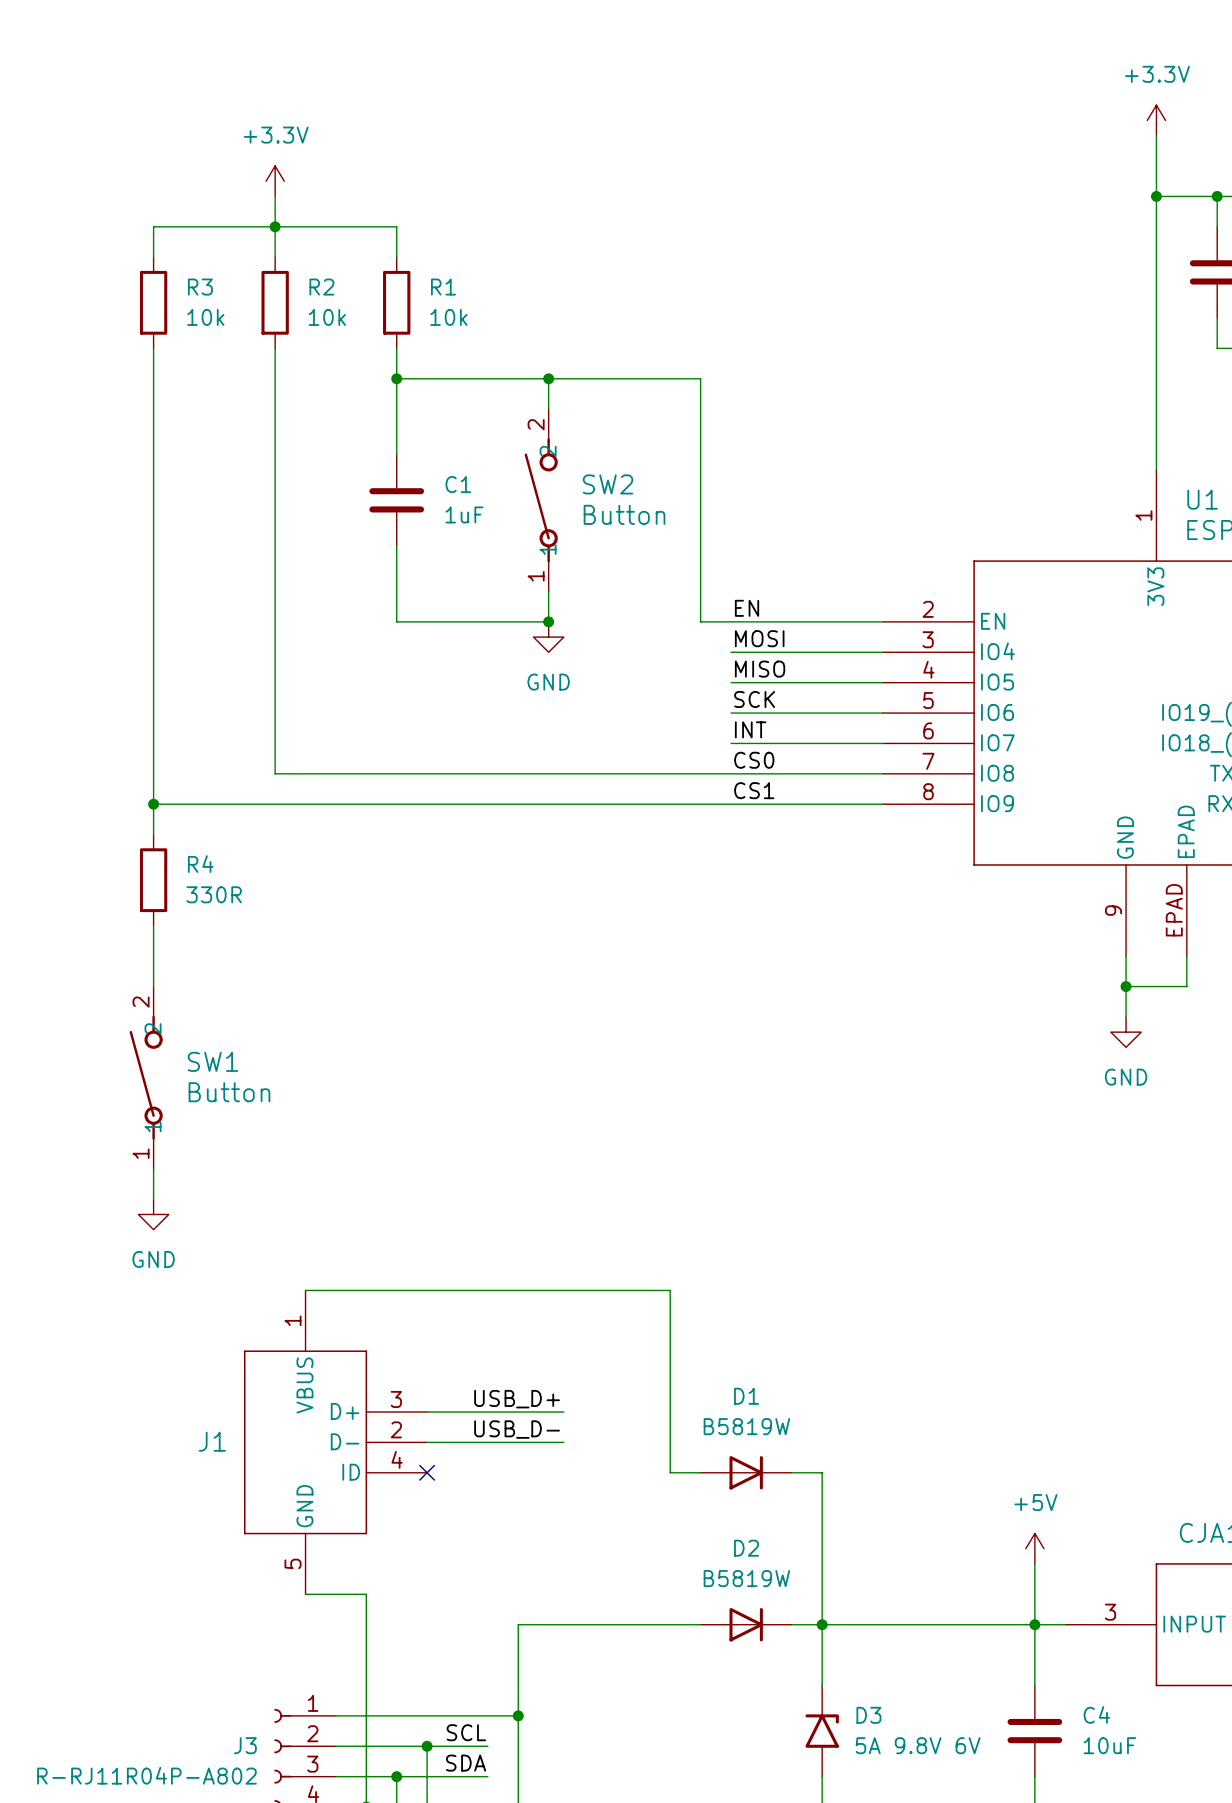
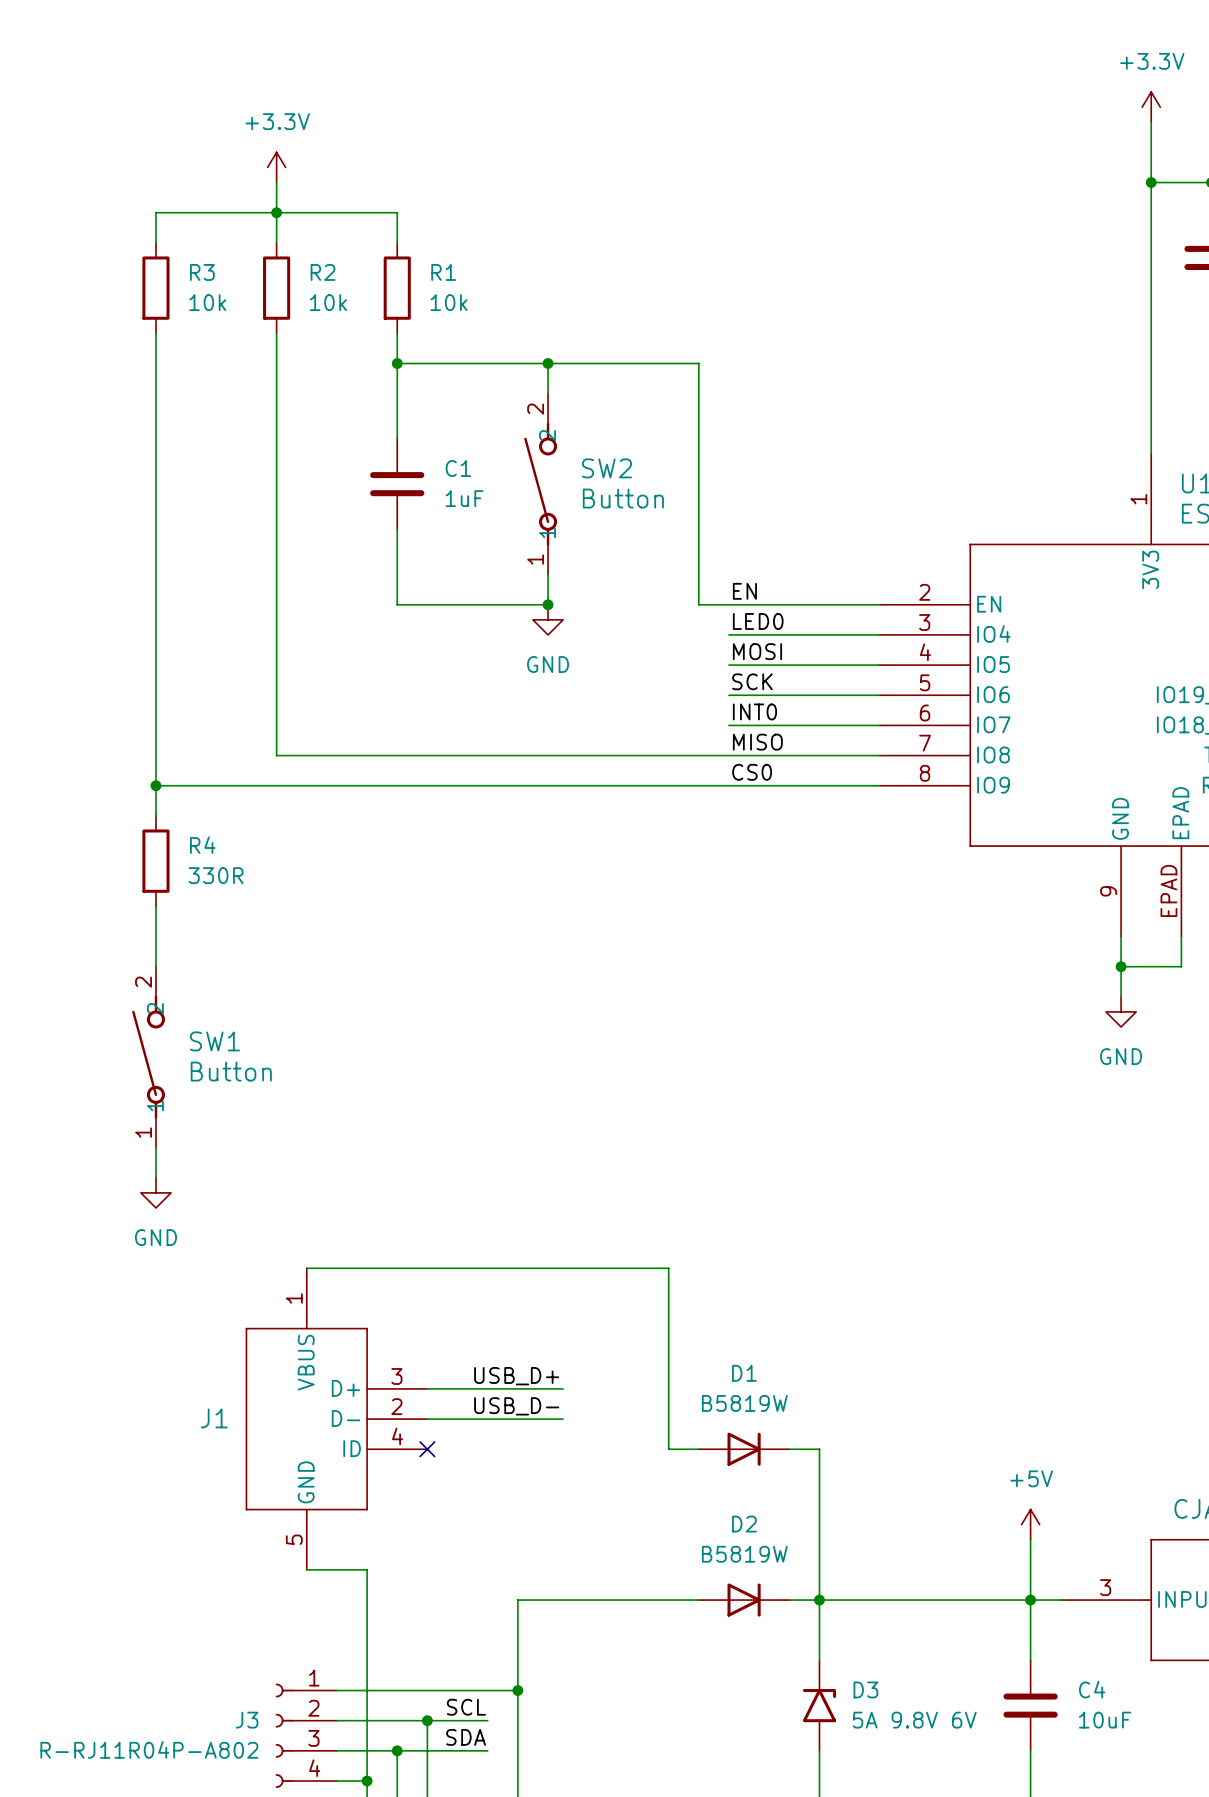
label: MOSI (759, 638) -> LED0 (758, 621)
label: MISO (760, 669) -> MOSI (757, 651)
label: INT (750, 729) -> INT0 (754, 711)
label: CS0 (754, 760) -> MISO (757, 742)
label: CS1 (754, 790) -> CS0 (752, 772)

